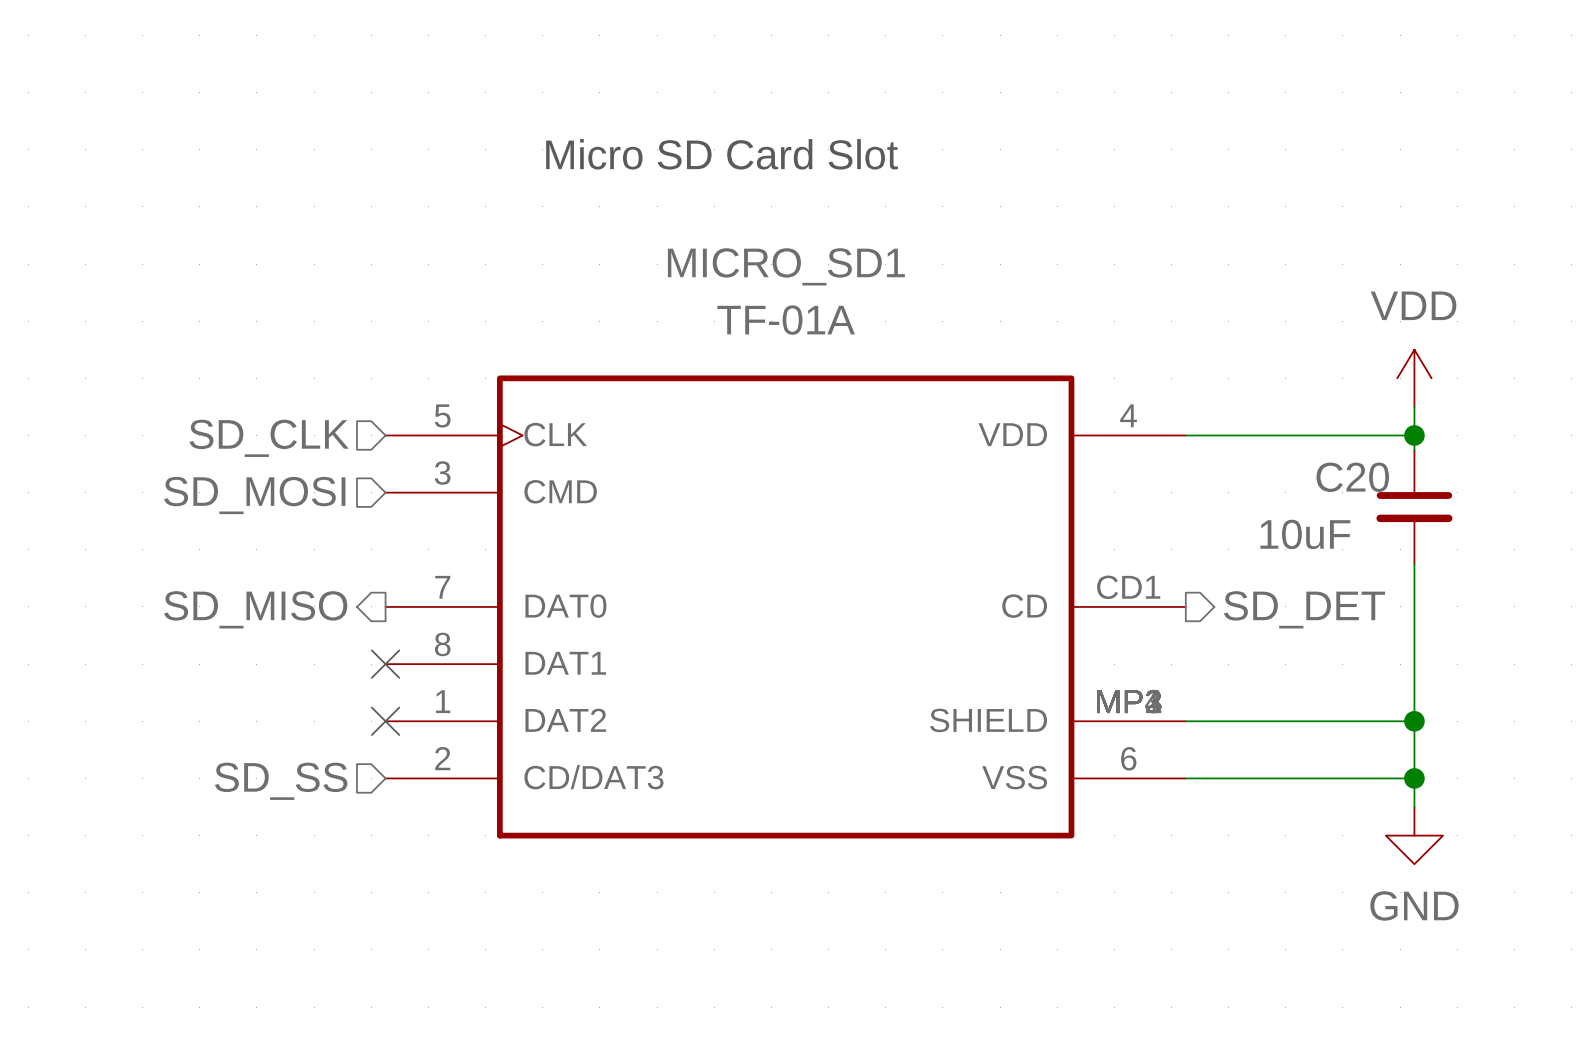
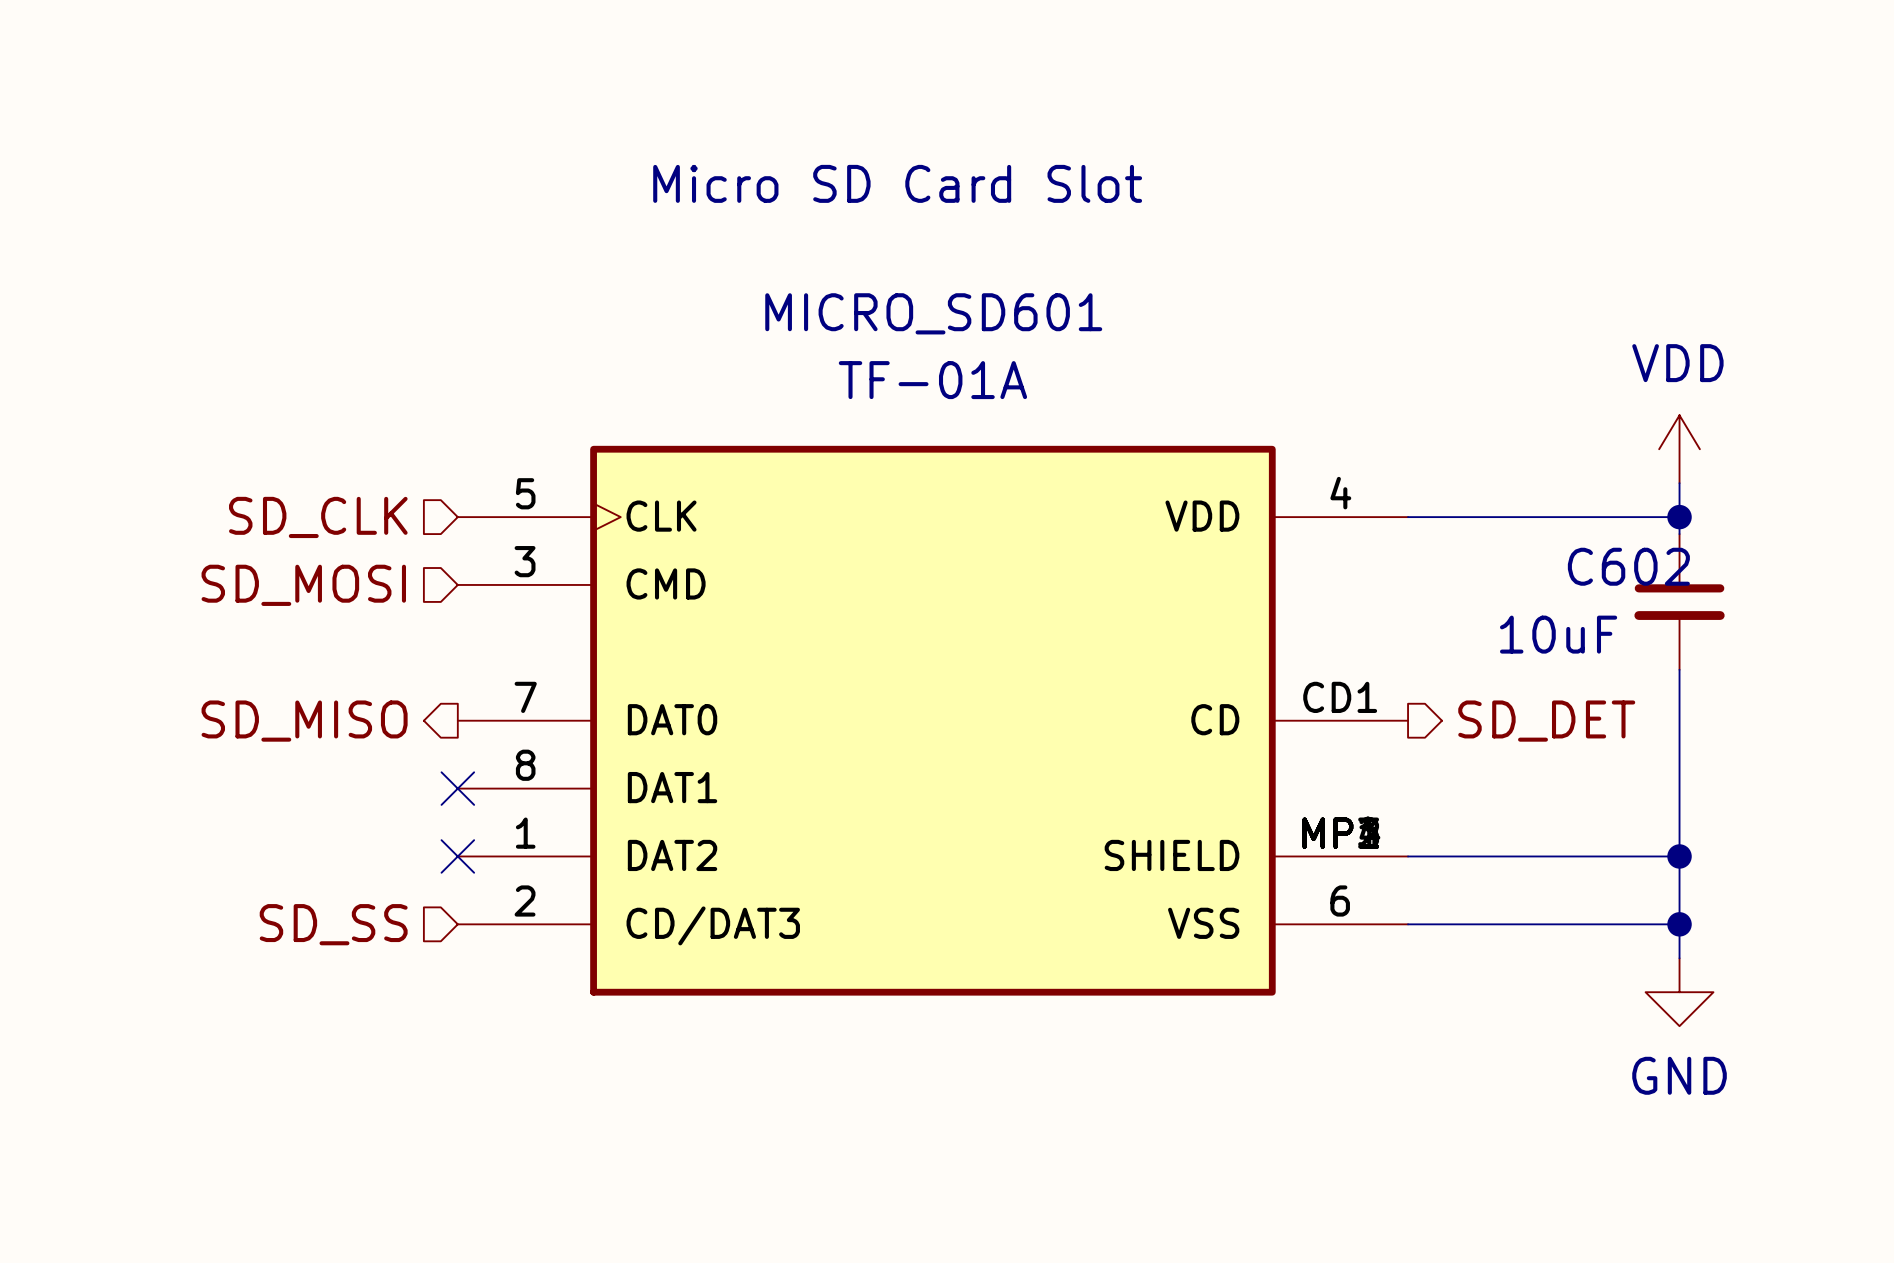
MICRO_SD1 name: MICRO_SD1 (786, 266) -> MICRO_SD601 (933, 313)
C20 name: C20 (1352, 477) -> C602 (1628, 566)

